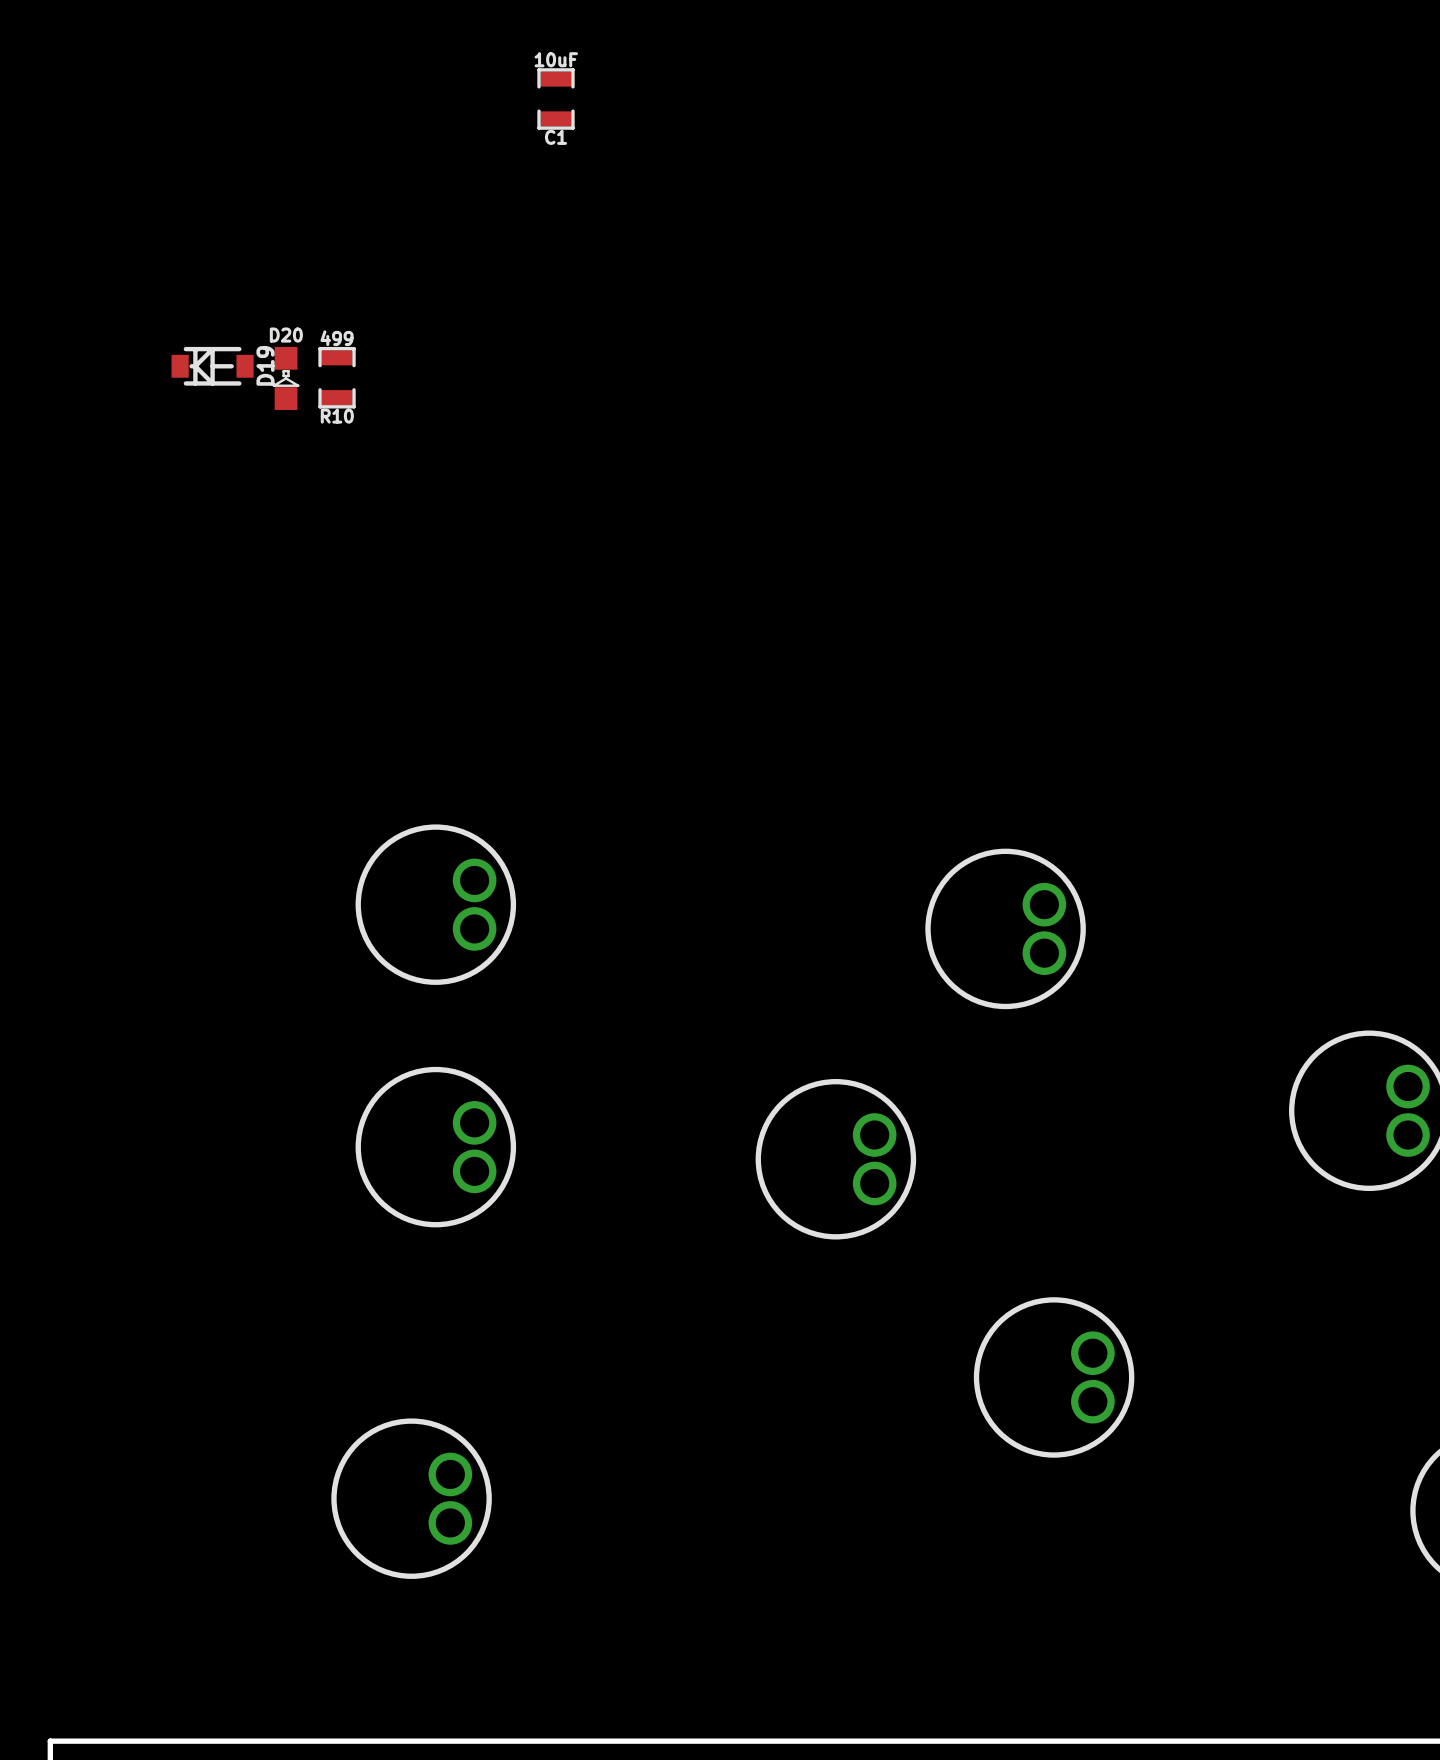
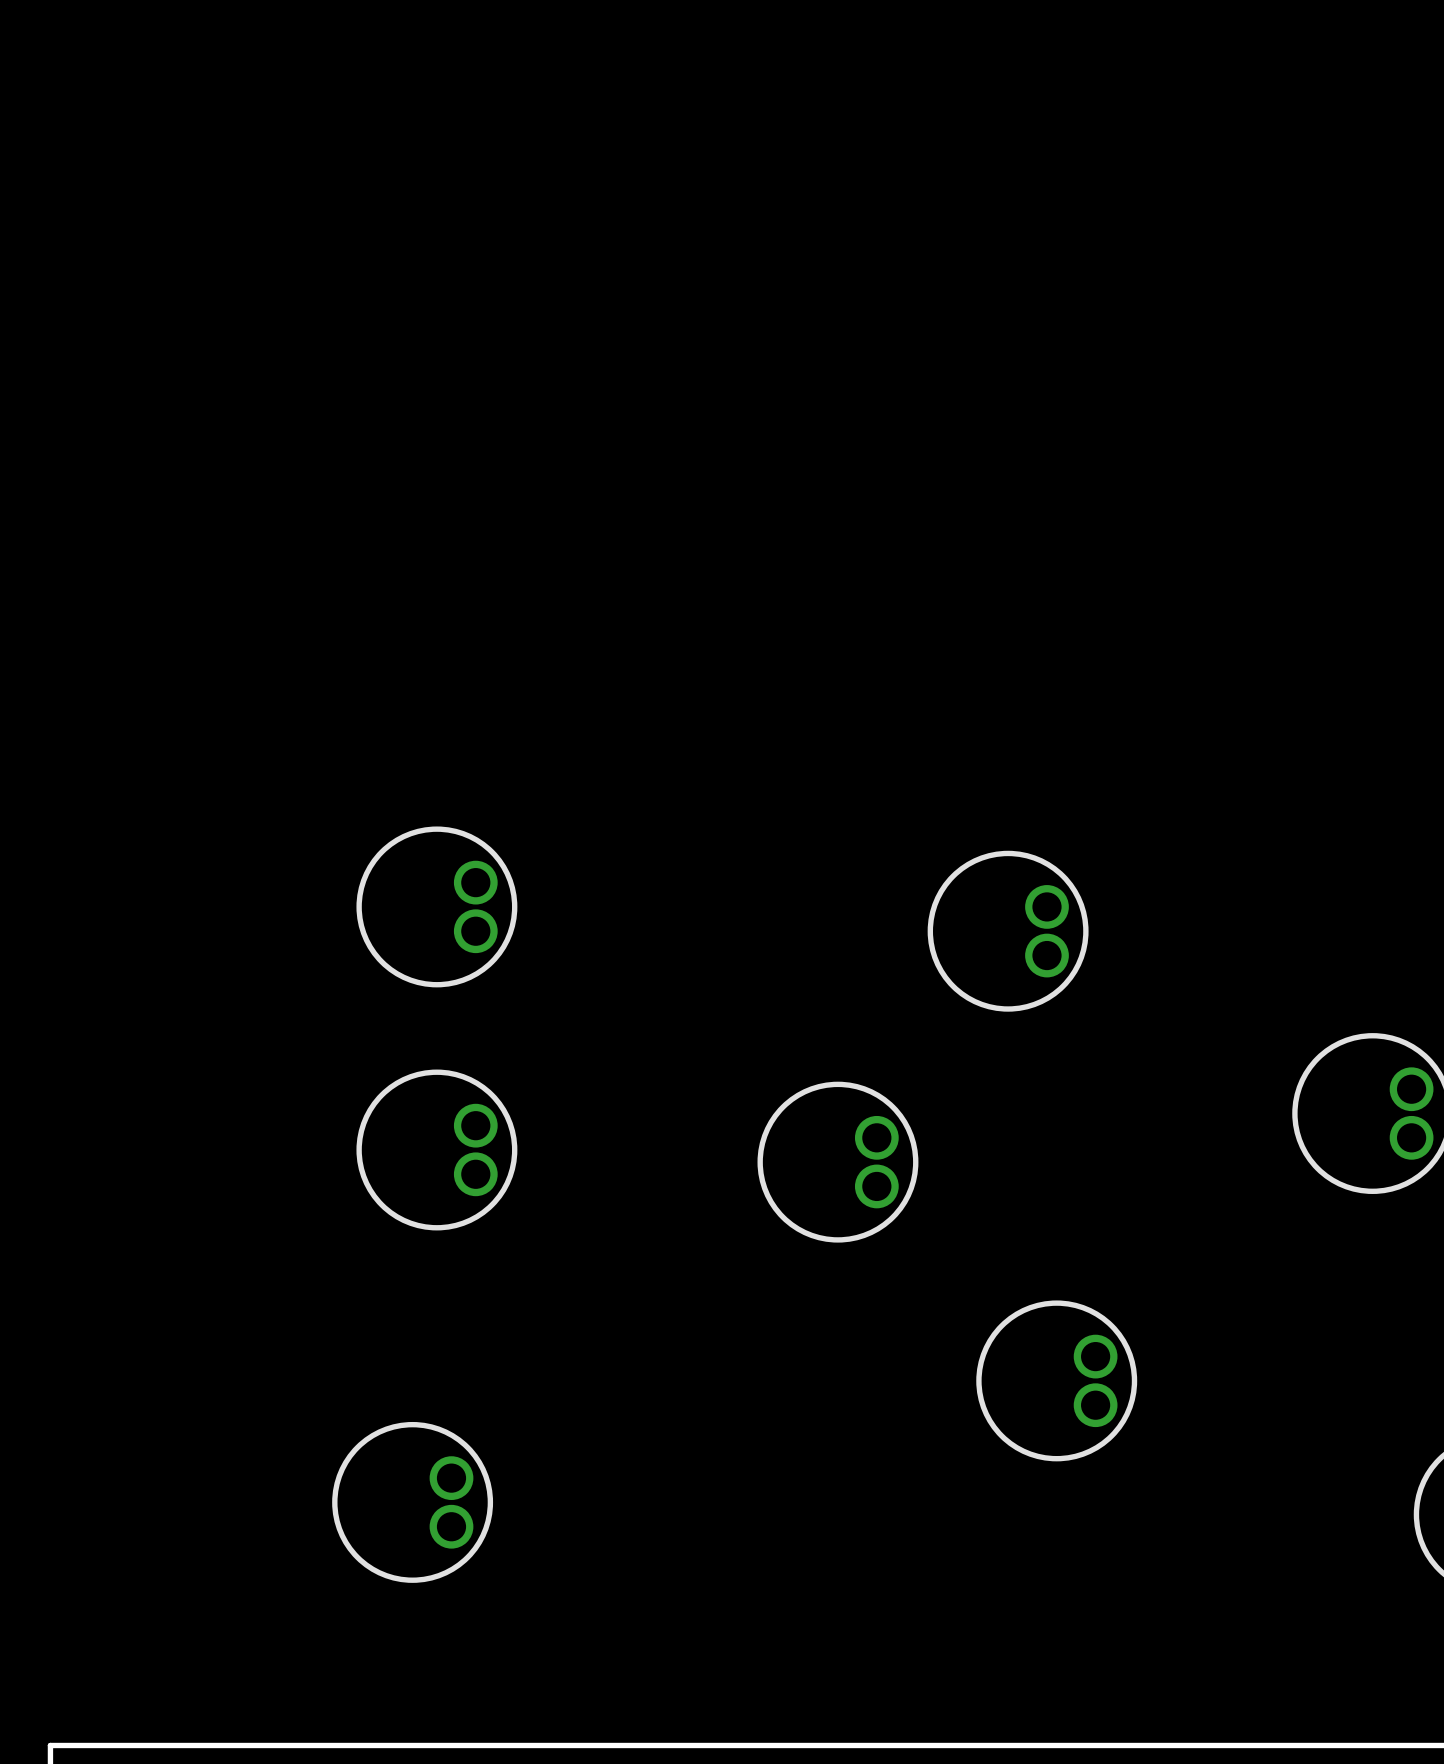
C1: 10uF (556, 98) -> none
D19: (212, 366) -> none
R10: 499 (337, 377) -> none
D20: (286, 378) -> none

